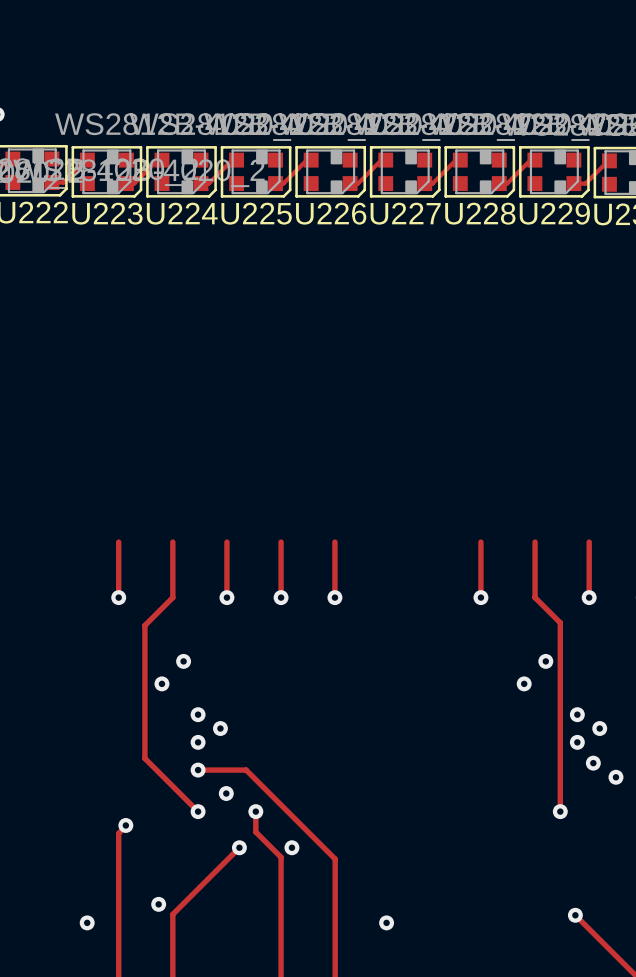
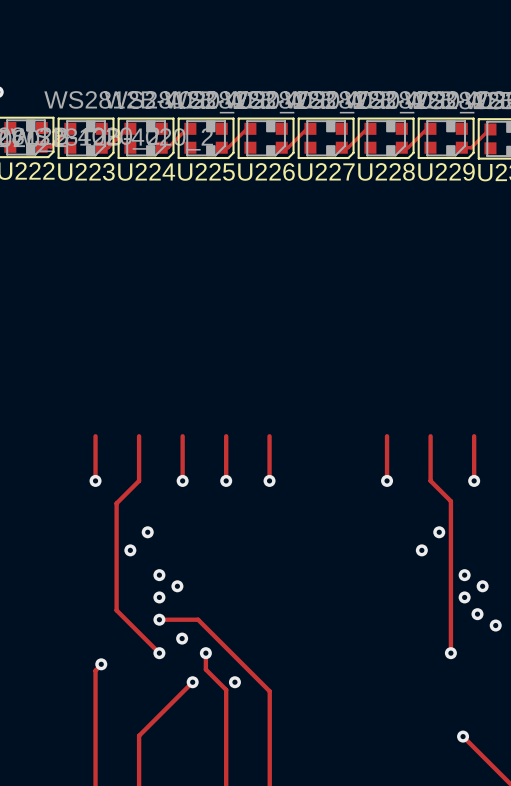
via: (158, 904) -> none
via: (87, 922) -> none
via: (386, 922) -> none

